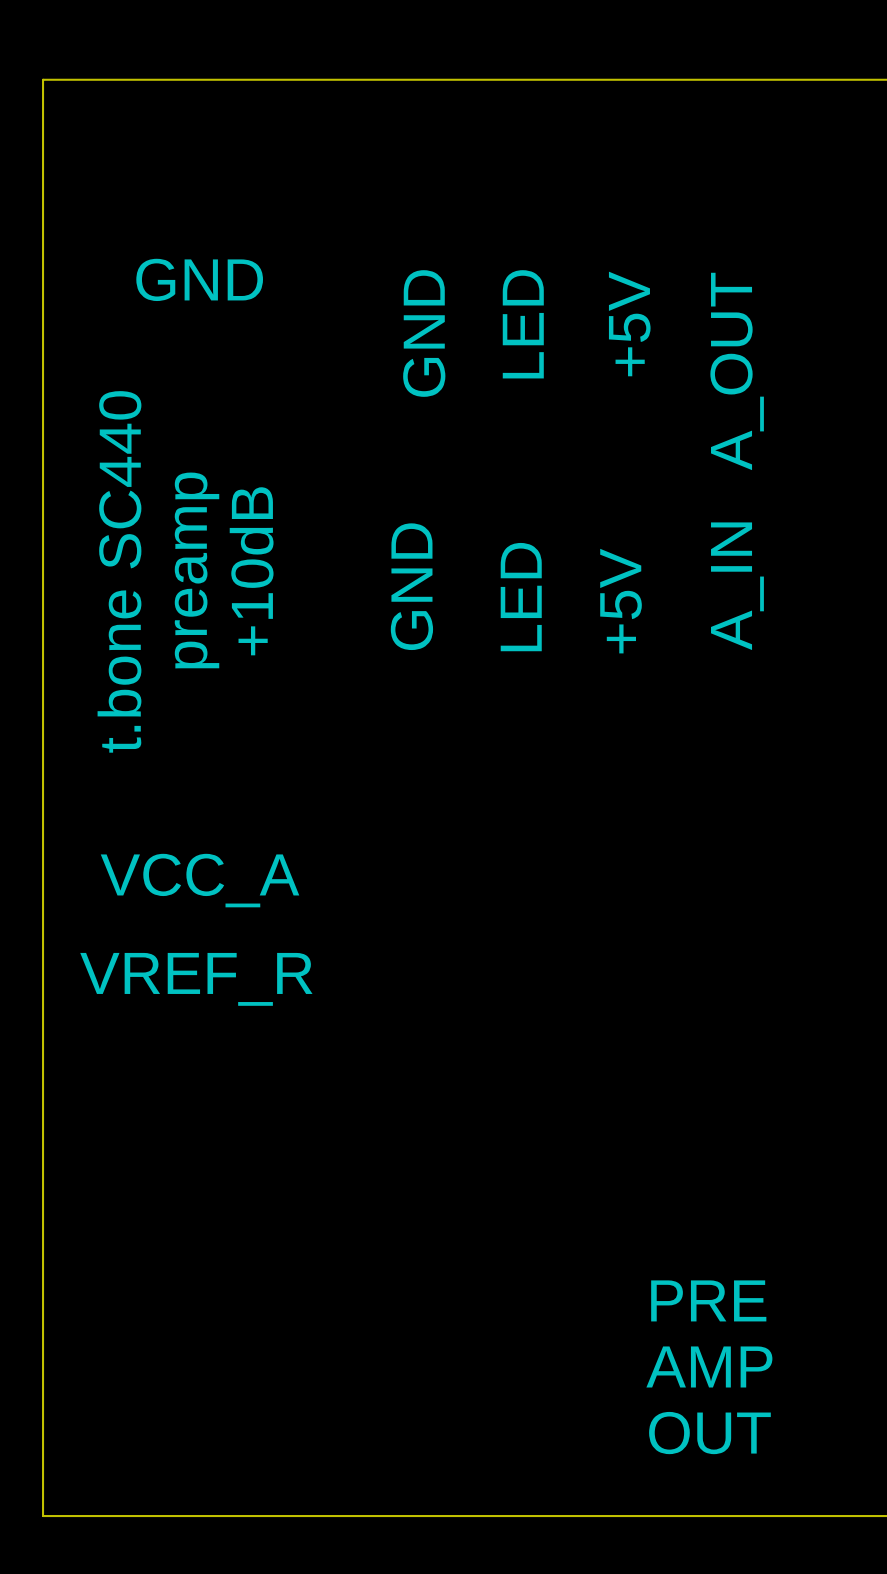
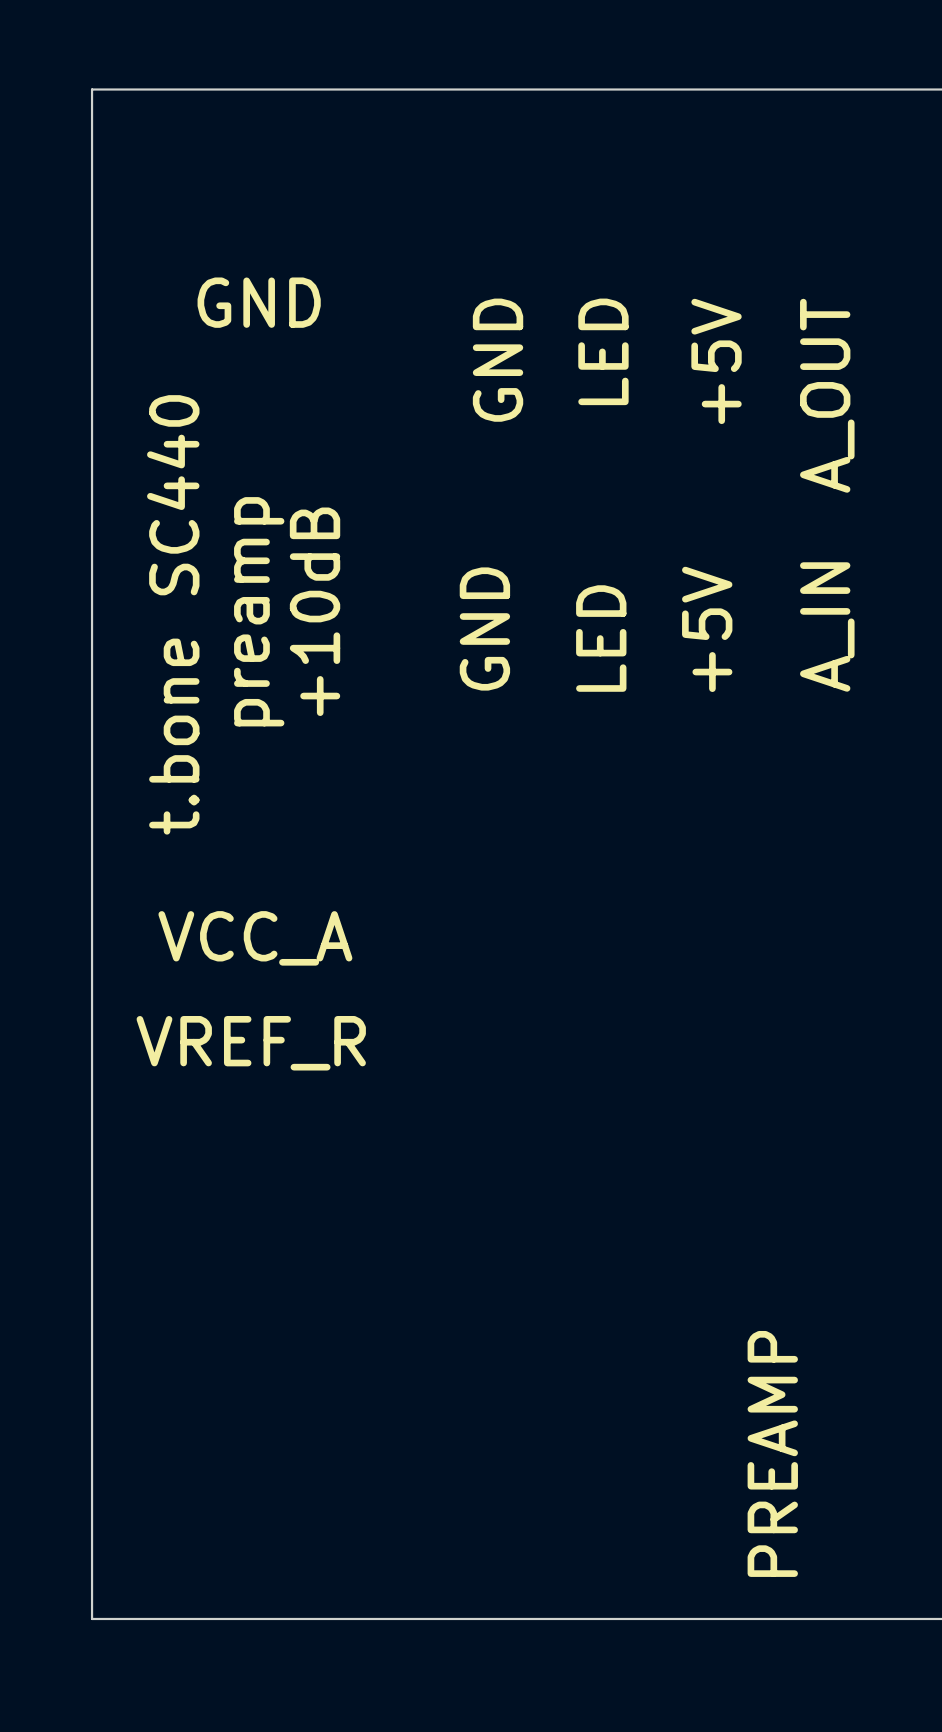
text: PRE (708, 1300) -> none
text: none -> PREAMP (772, 1453)
text: AMP (709, 1366) -> none
text: OUT (709, 1433) -> none

